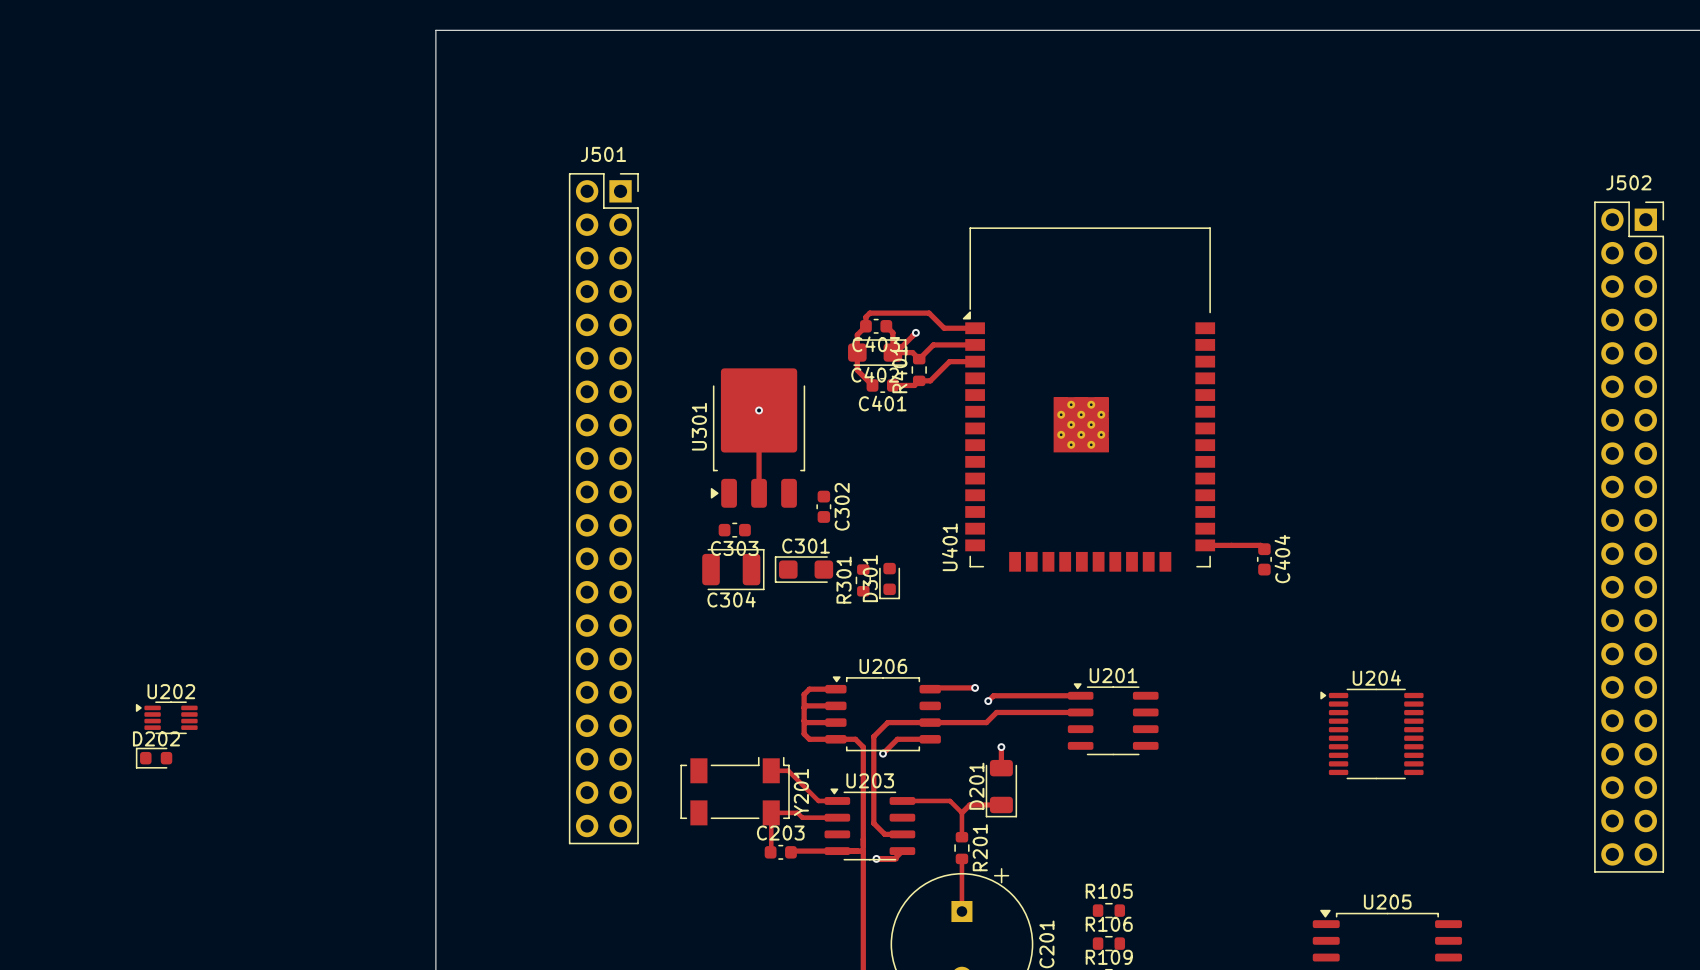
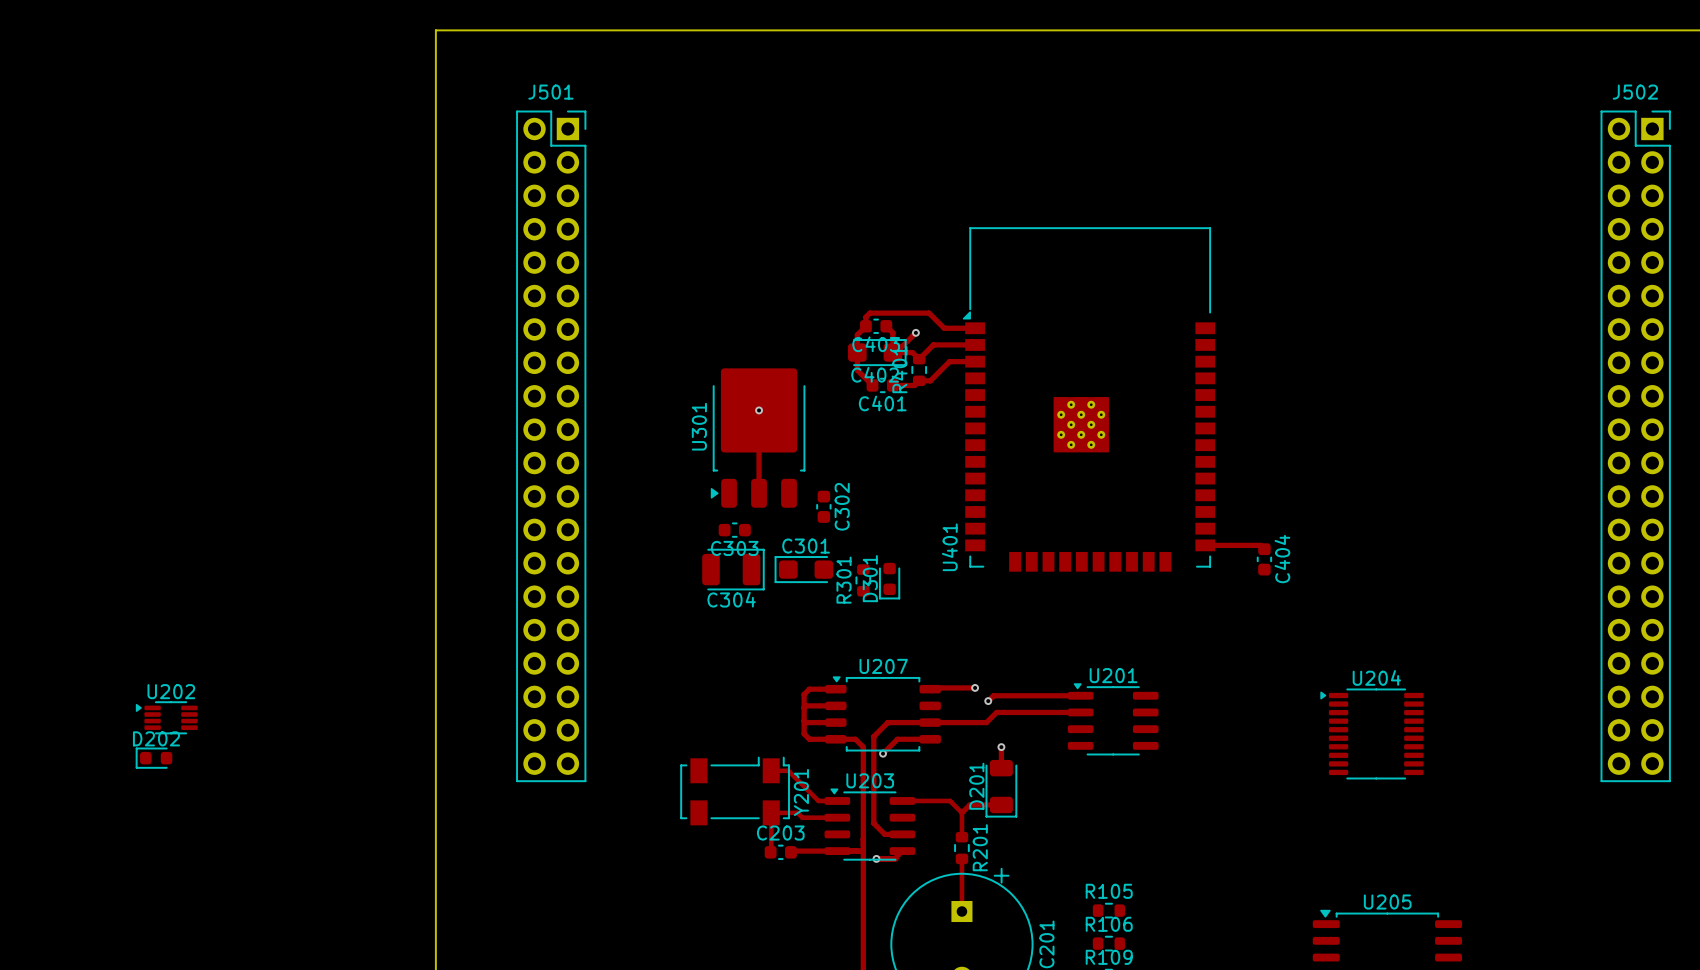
J501 position: (603, 508) -> (551, 446)
J502 position: (1629, 537) -> (1635, 446)
U206 name: U206 (883, 666) -> U207 (883, 666)

